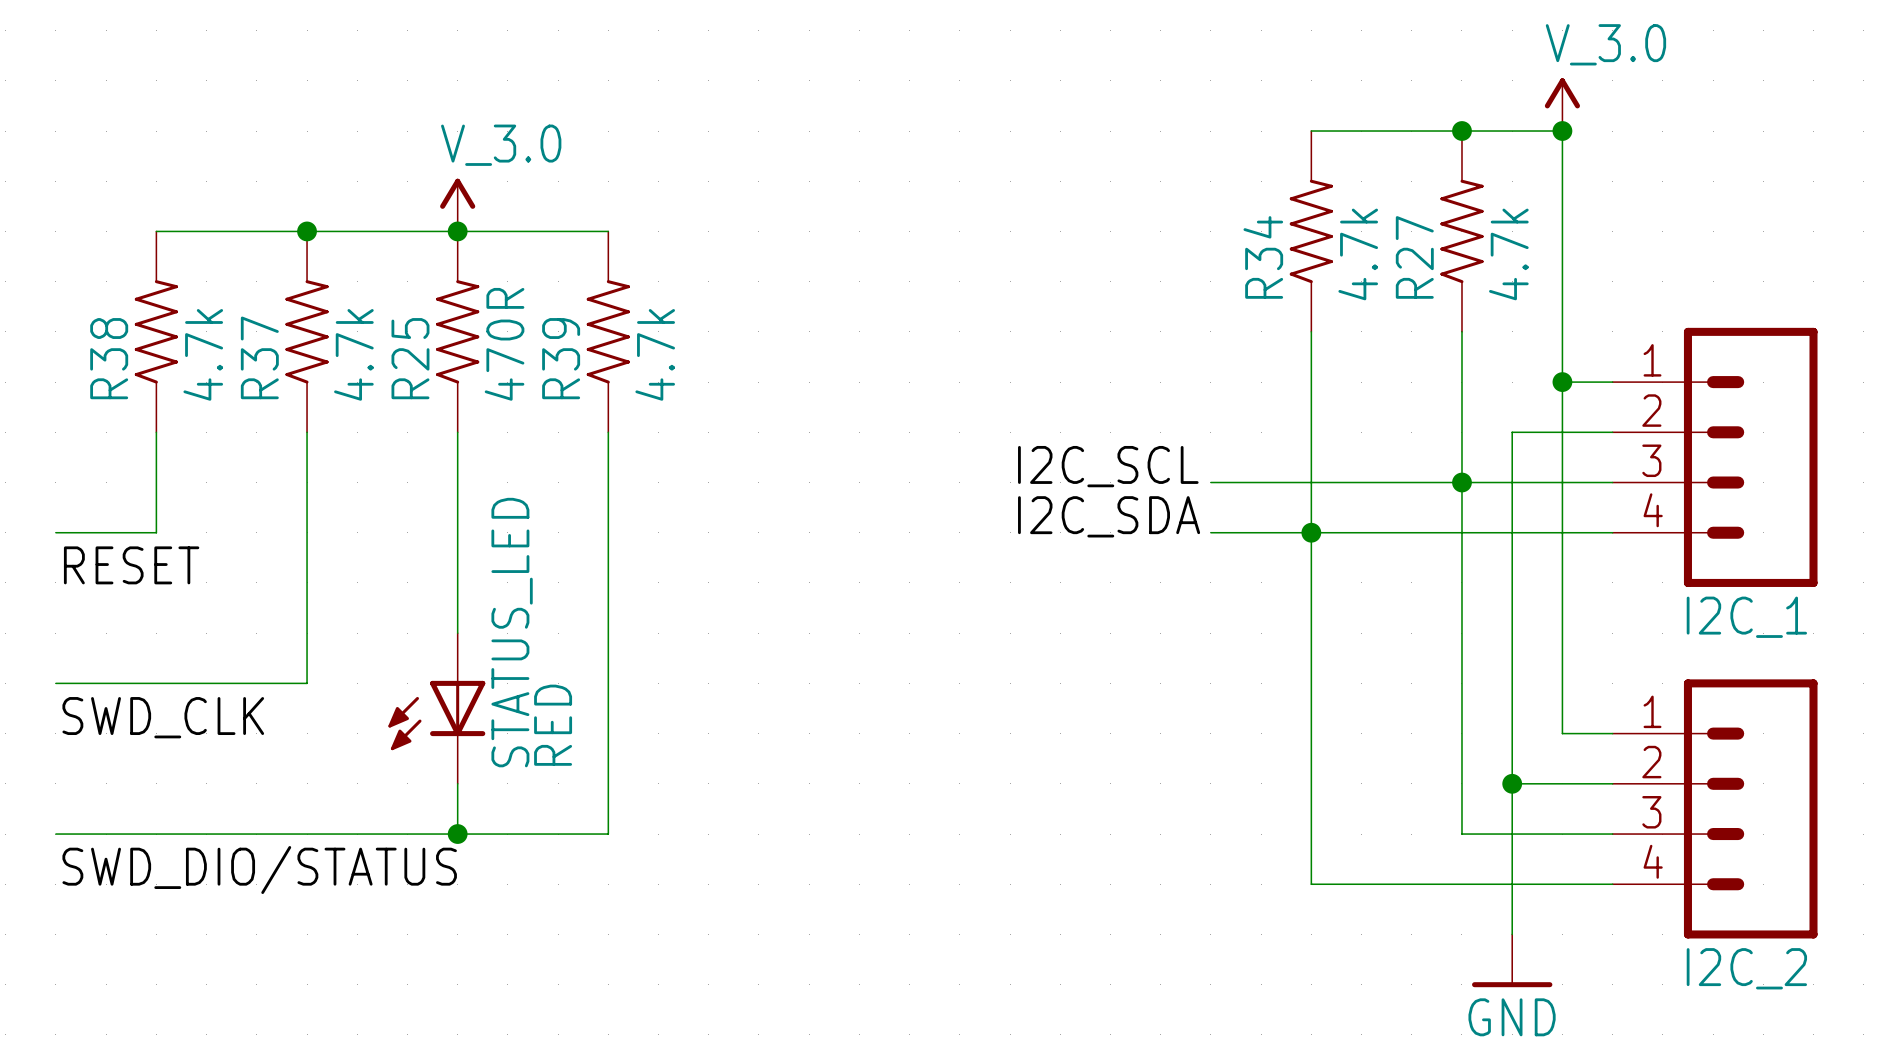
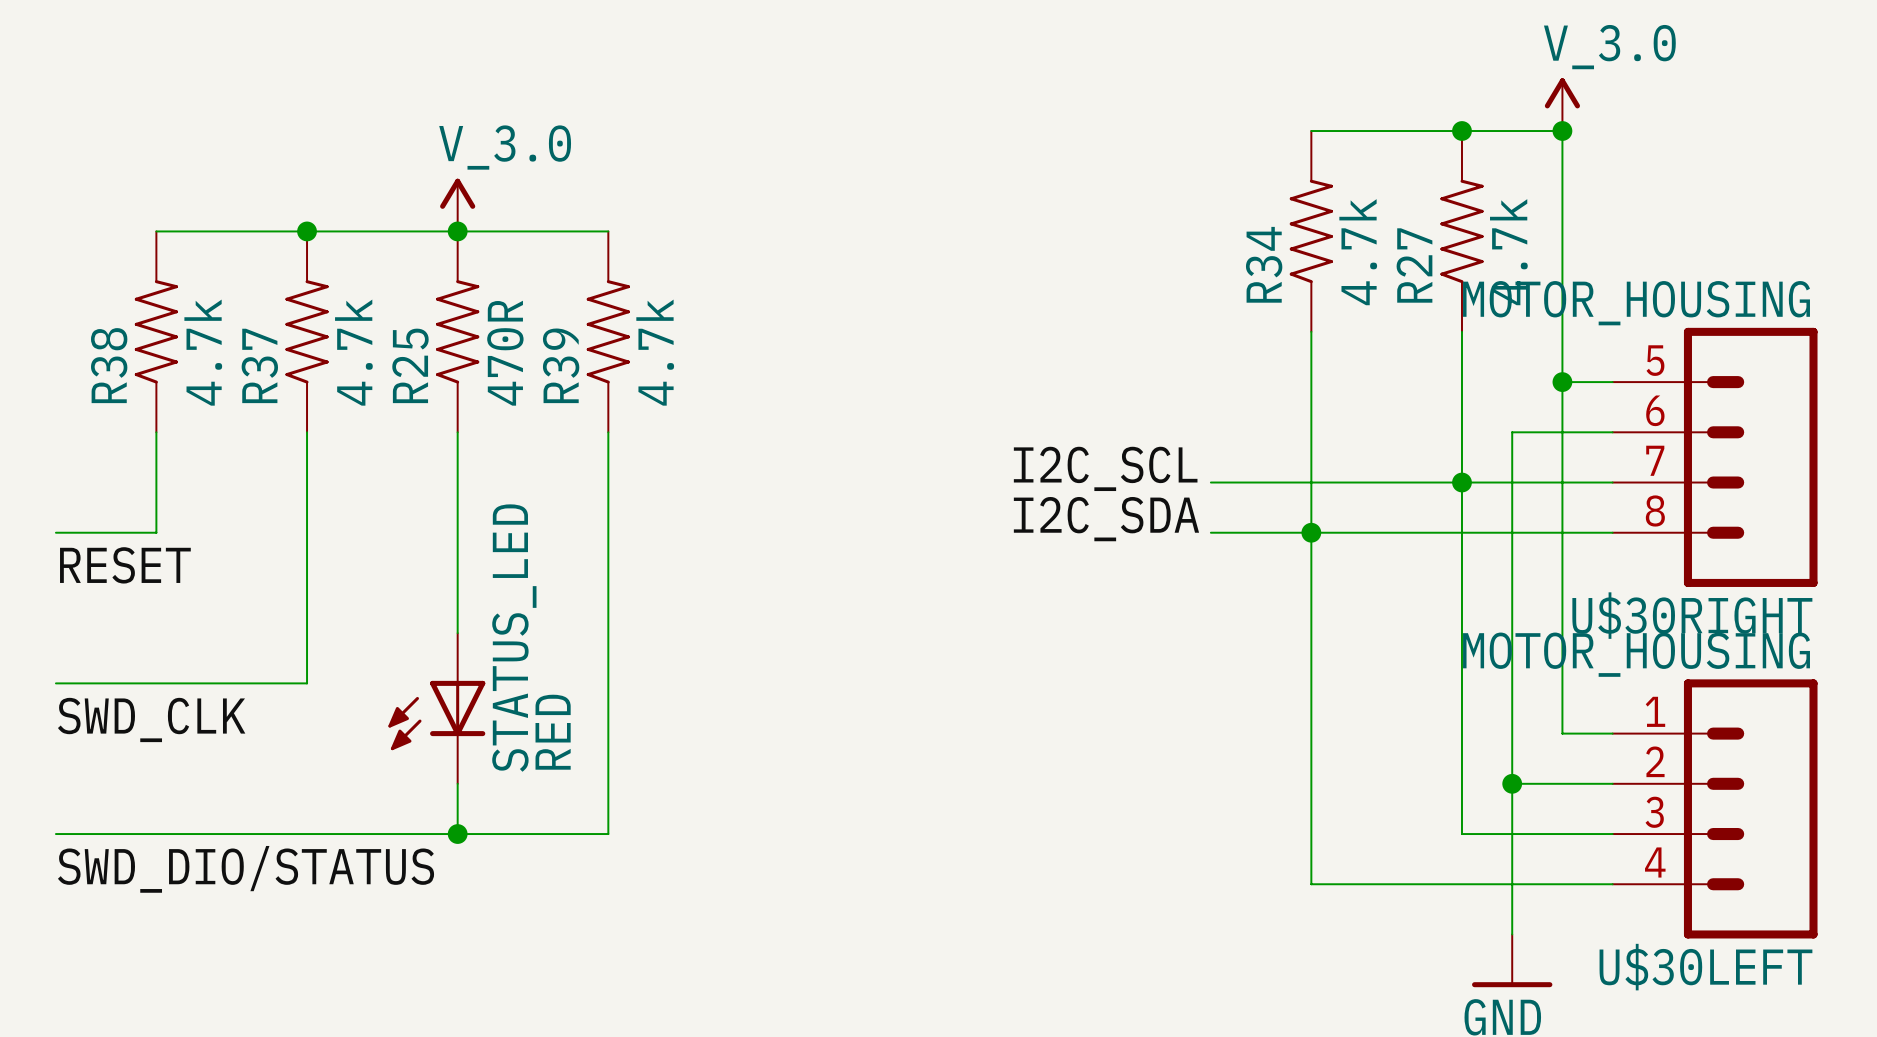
I2C_1 value: none -> MOTOR_HOUSING (1636, 303)
I2C_1 pin number: 1 (1652, 360) -> 5 (1655, 360)
I2C_1 pin number: 2 (1651, 410) -> 6 (1655, 410)
I2C_1 pin number: 3 (1651, 460) -> 7 (1655, 460)
I2C_1 pin number: 4 (1653, 510) -> 8 (1655, 510)
I2C_1 name: I2C_1 (1746, 617) -> U$30RIGHT (1692, 615)
I2C_2 value: none -> MOTOR_HOUSING (1636, 654)
I2C_2 name: I2C_2 (1746, 968) -> U$30LEFT (1705, 967)

